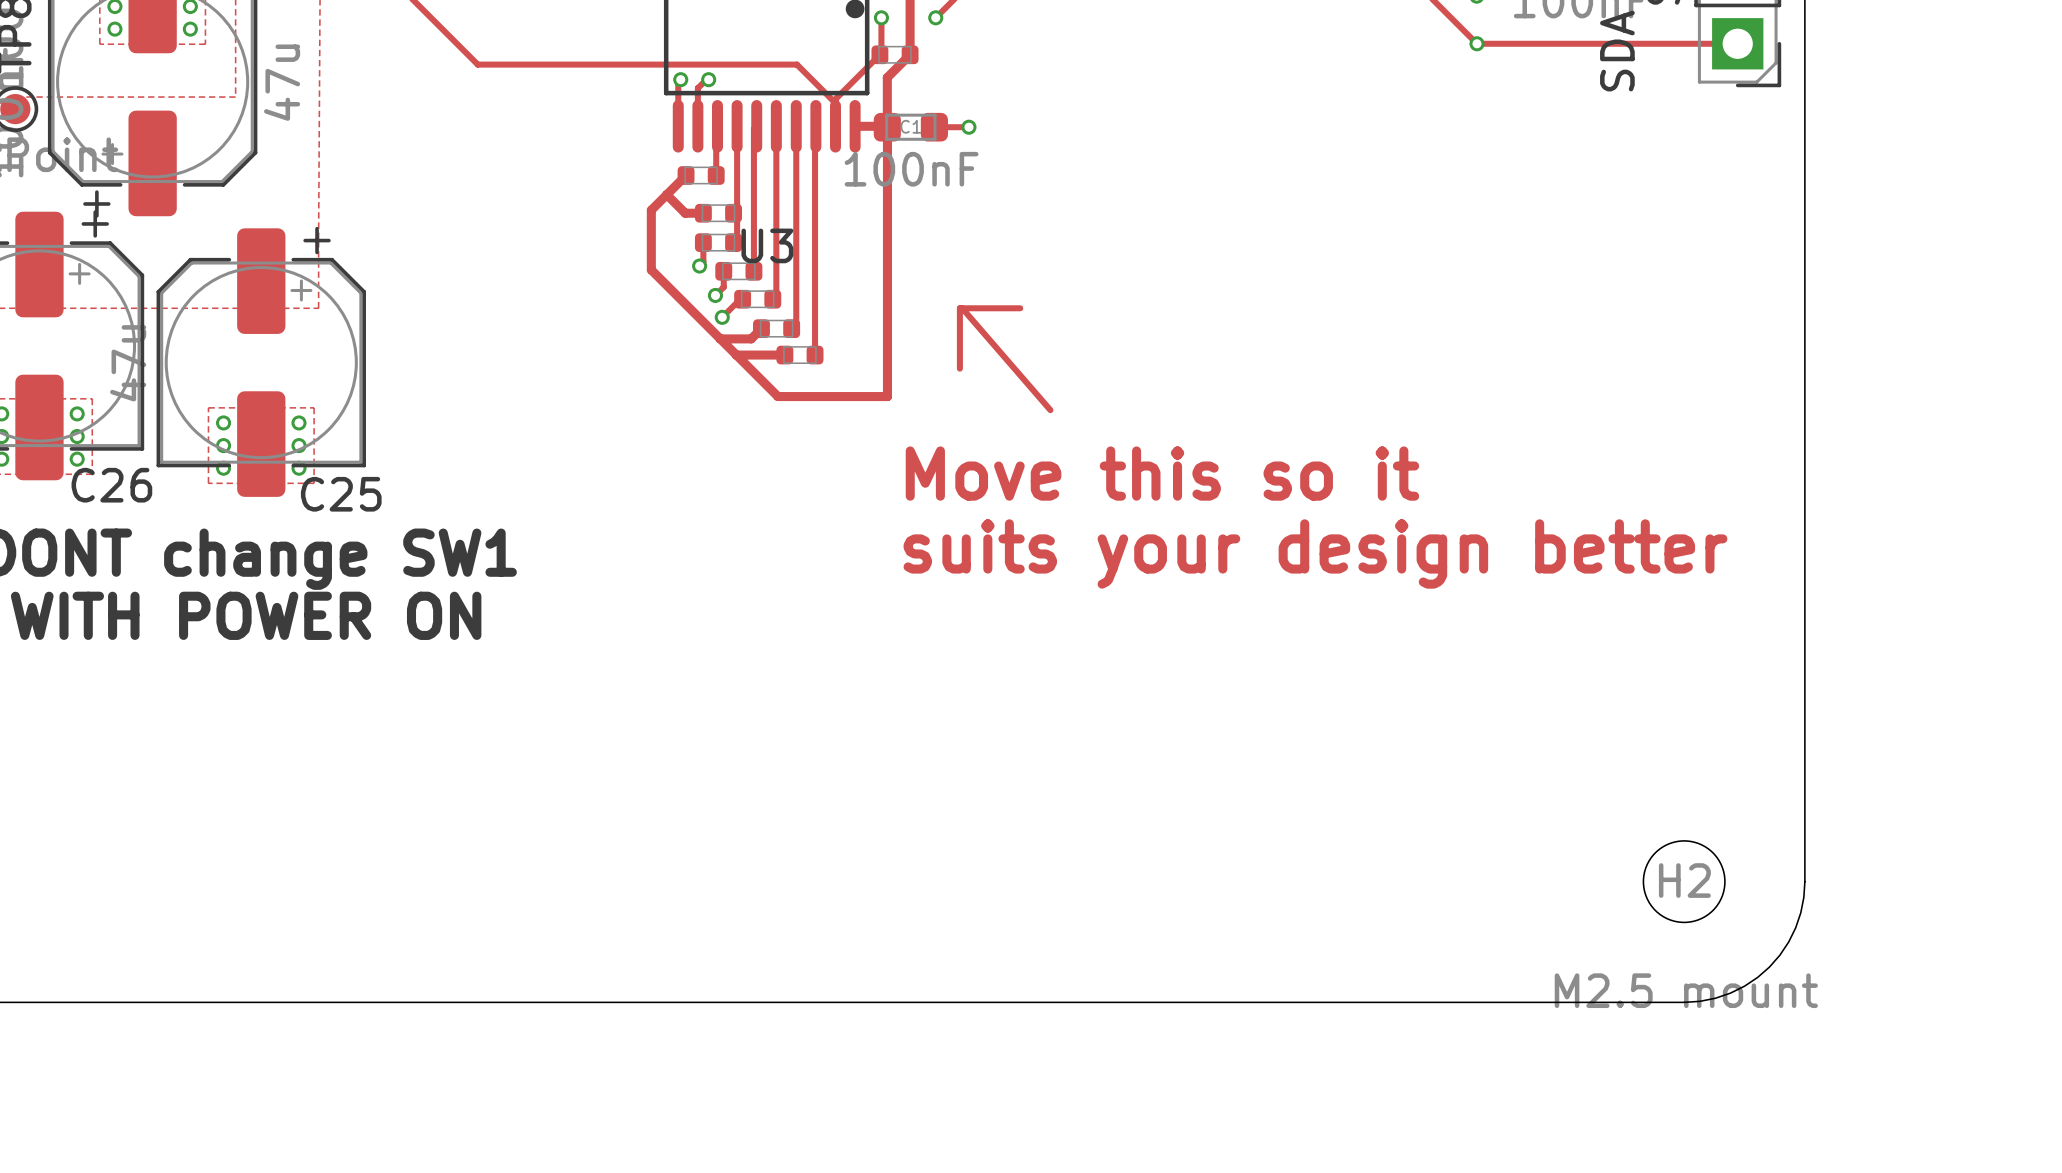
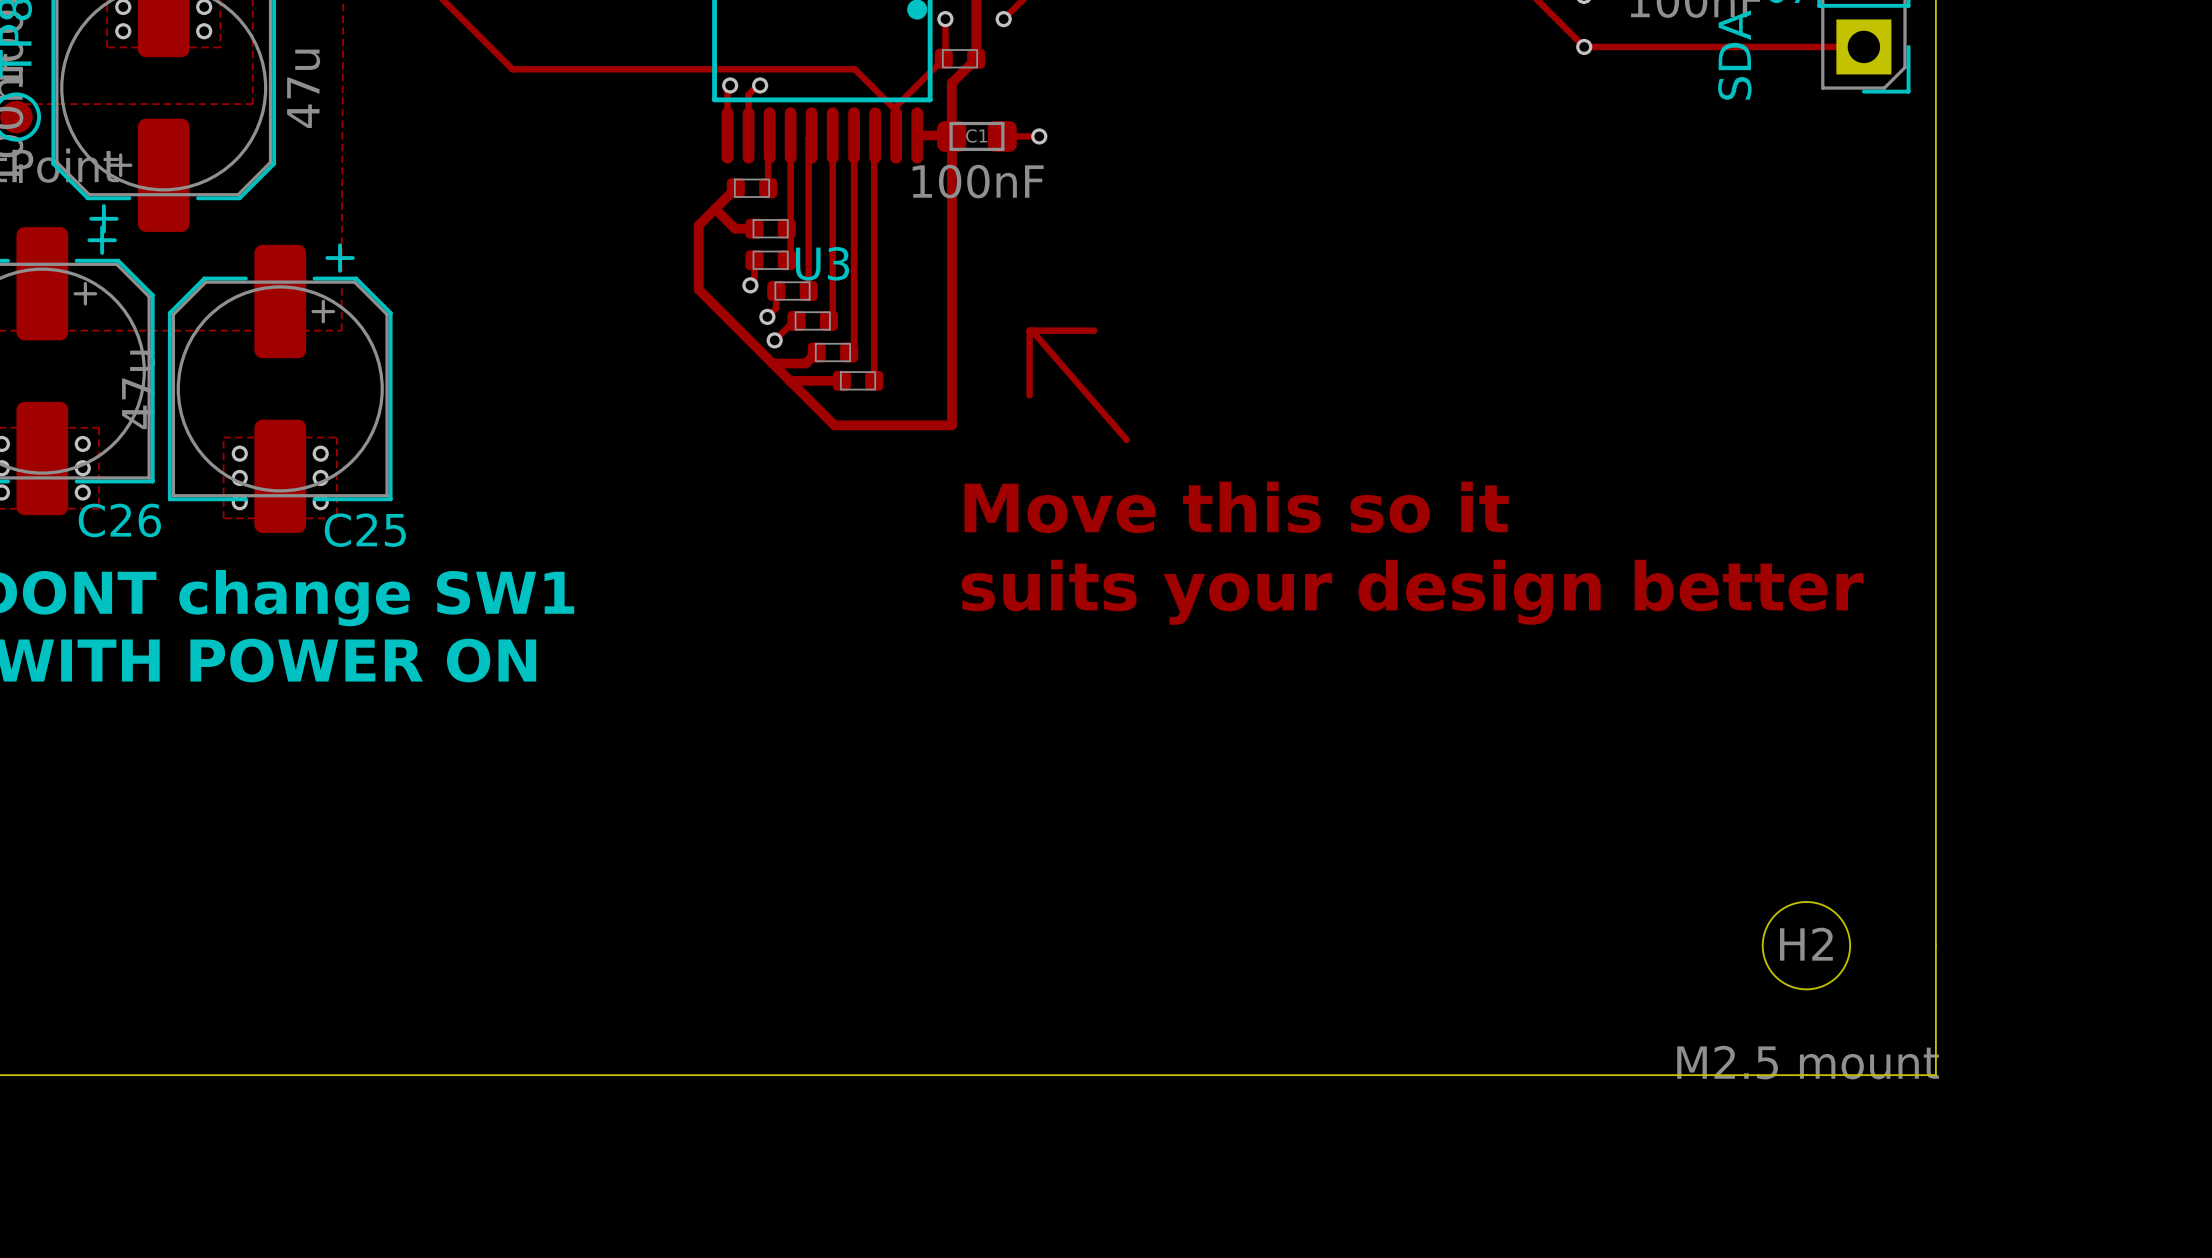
board edge: (1804, 881) (1800, 912) (1795, 927) (1788, 942) (1769, 967) (1757, 977) (1730, 993) (1715, 998) (1684, 1002) -> (1935, 945) (1935, 1075) (1806, 1075)

